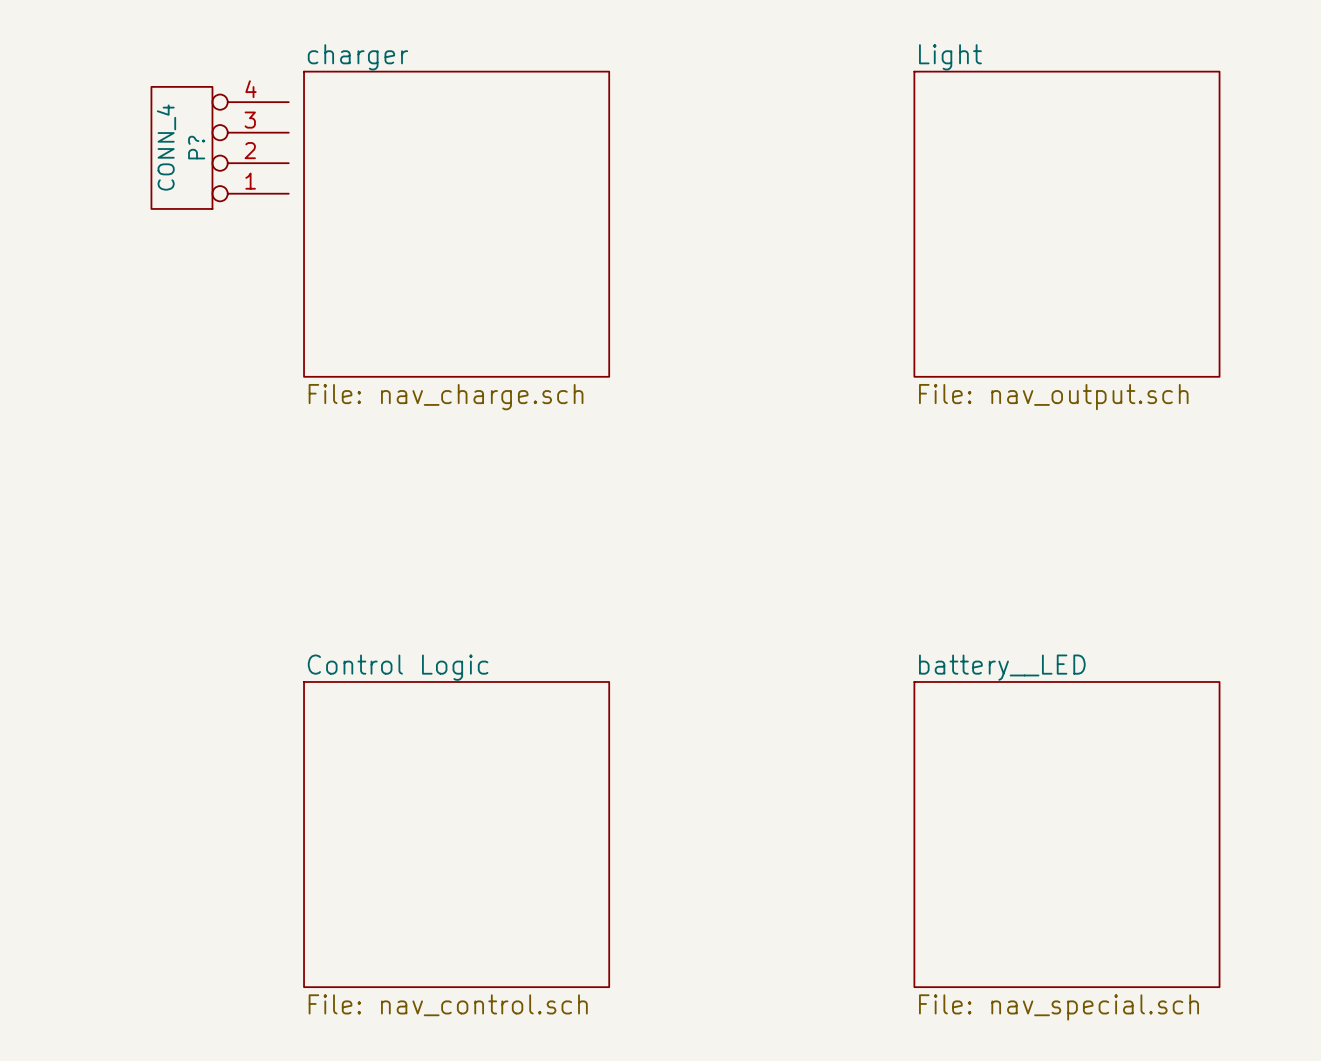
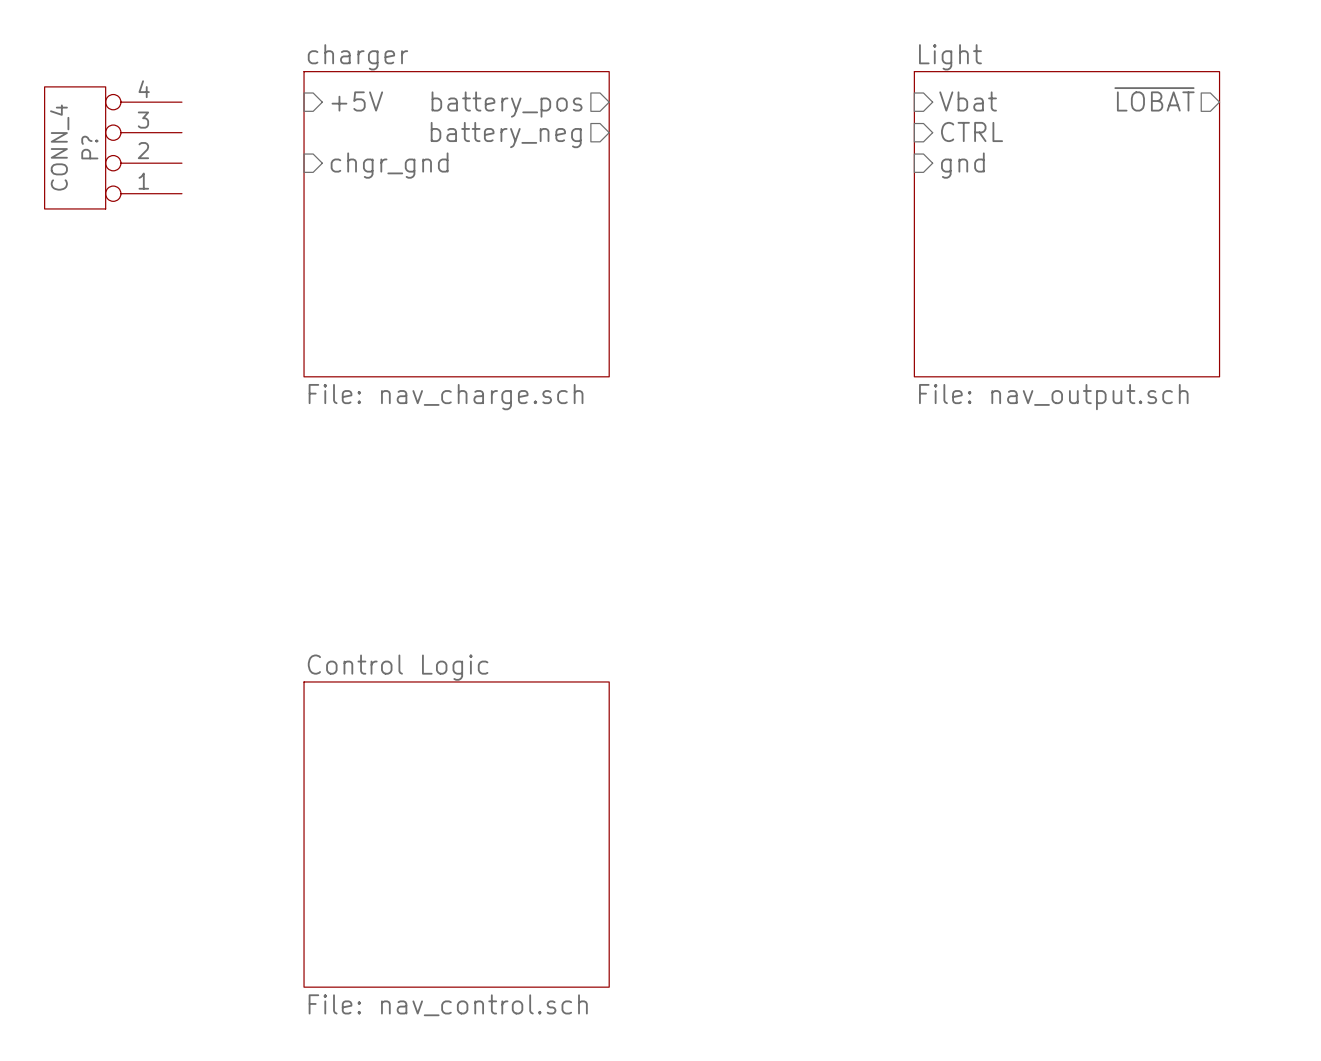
sheet pin: none -> ~{LOBAT} (1154, 99)
sheet pin: none -> +5V (357, 101)
sheet pin: none -> Vbat (968, 101)
sheet pin: none -> battery_pos (507, 104)
sheet pin: none -> CTRL (972, 131)
sheet pin: none -> battery_neg (506, 135)
P? position: (220, 147) -> (113, 147)
sheet pin: none -> chgr_gnd (389, 165)
sheet pin: none -> gnd (962, 165)
sheet battery__LED: File: nav_special.sch (1066, 834) -> none

